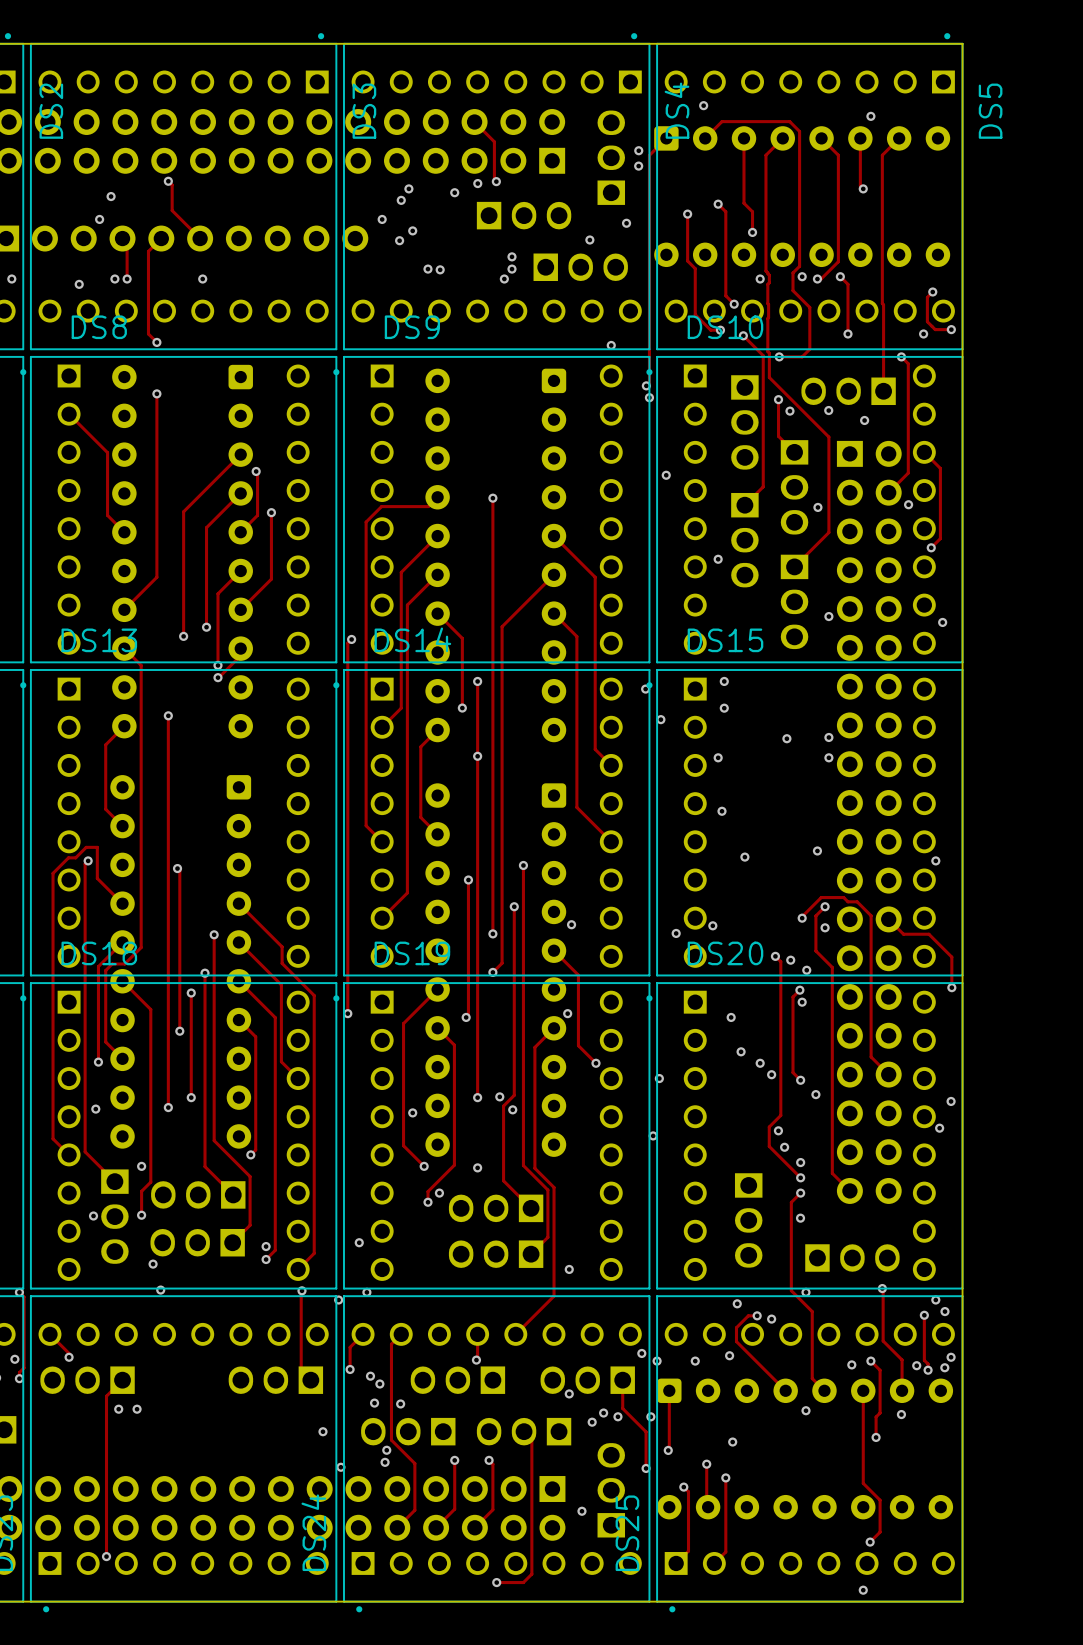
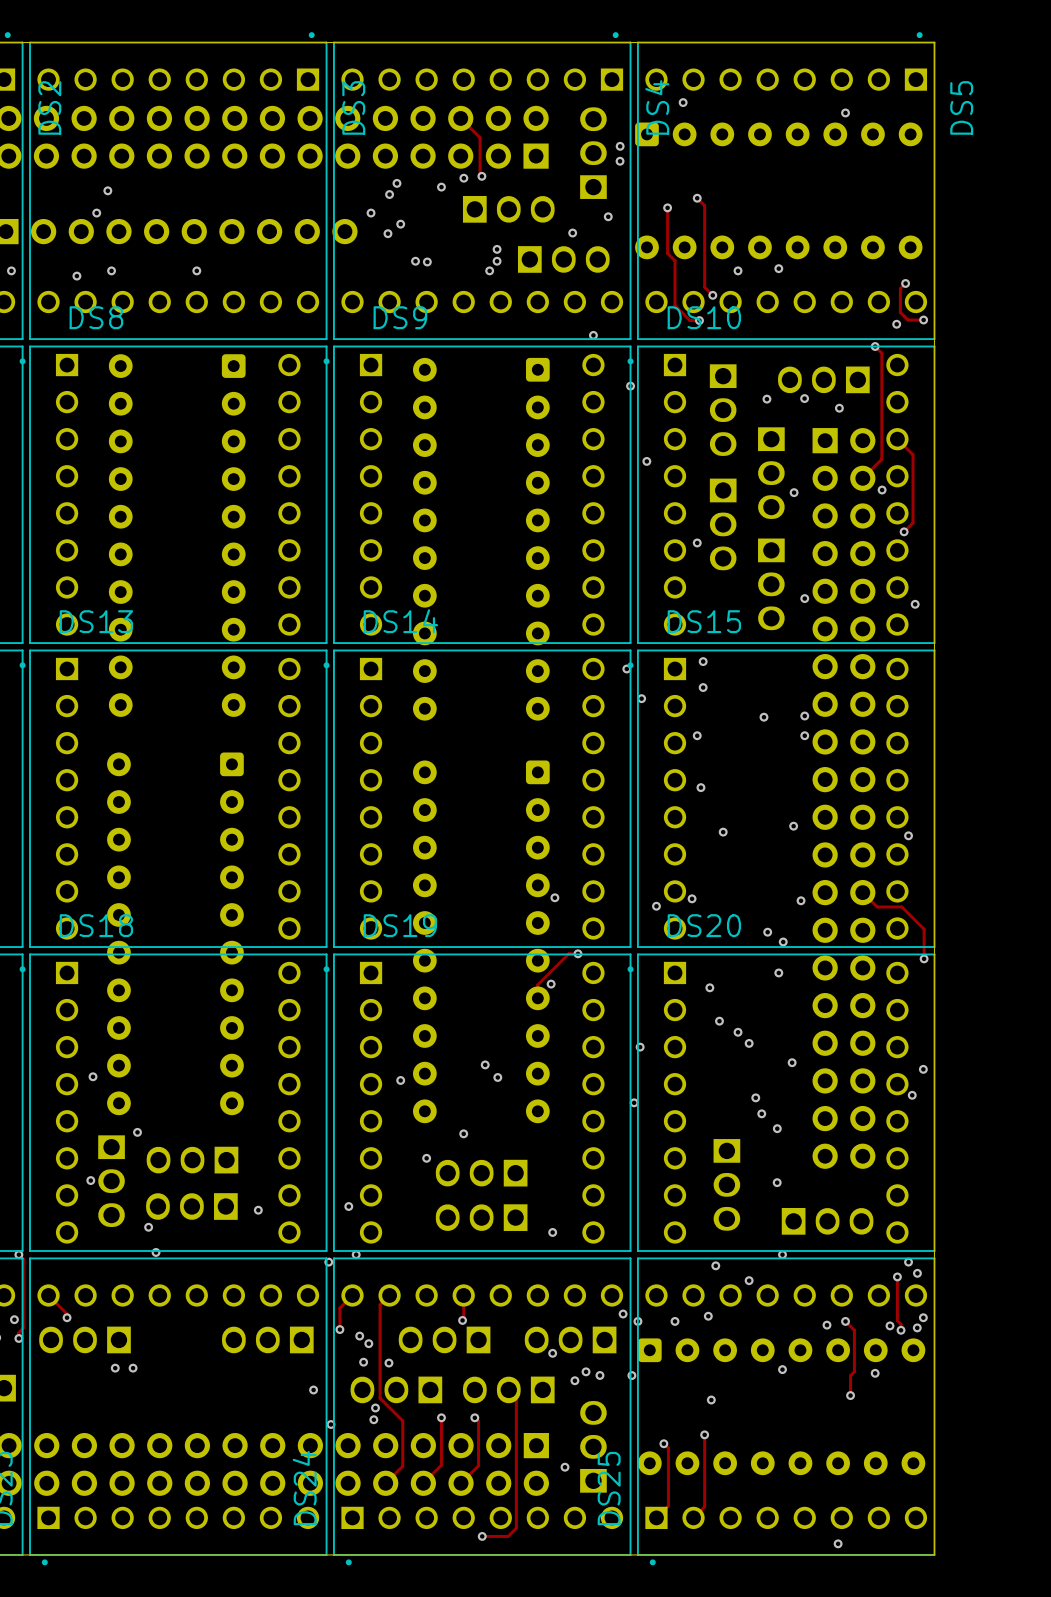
track: (666, 138) (649, 155) (649, 382) (646, 385) -> none
track: (705, 138) (722, 121) (789, 121) (799, 131) (799, 266) (793, 272) (793, 290) (809, 307) (809, 349) (802, 356) (779, 356) -> none
track: (743, 138) (743, 203) (752, 211) (752, 232) -> none
track: (782, 138) (765, 155) (765, 271) (769, 275) (767, 351) (769, 377) (828, 437) (828, 532) (794, 566) -> none
track: (821, 138) (838, 155) (838, 261) (821, 279) (817, 279) -> none
track: (860, 138) (860, 186) (863, 188) -> none
track: (899, 138) (882, 155) (883, 391) -> none
track: (168, 181) (172, 185) (172, 210) (200, 238) -> none
via: (168, 181) -> none
via: (863, 188) -> none
via: (752, 232) -> none
track: (122, 238) (127, 243) (127, 279) -> none
track: (161, 238) (148, 251) (148, 334) (156, 342) -> none
track: (840, 276) (847, 284) (847, 333) -> none
via: (840, 276) -> none
via: (127, 279) -> none
via: (817, 279) -> none
via: (847, 333) -> none
track: (743, 335) (763, 355) (763, 486) (744, 505) -> none
via: (743, 335) -> none
via: (156, 342) -> none
via: (779, 356) -> none
via: (646, 385) -> none
track: (156, 393) (156, 577) (124, 609) -> none
via: (156, 393) -> none
track: (778, 399) (778, 436) (794, 452) -> none
via: (778, 399) -> none
track: (69, 414) (107, 452) (107, 515) (124, 532) -> none
track: (240, 454) (183, 511) (183, 636) -> none
track: (256, 471) (257, 515) (240, 532) -> none
via: (256, 471) -> none
track: (240, 493) (206, 527) (206, 627) -> none
track: (437, 497) (428, 506) (381, 506) (366, 522) (366, 825) (382, 841) -> none
track: (492, 498) (492, 933) -> none
via: (492, 498) -> none
track: (271, 512) (271, 579) (240, 609) -> none
via: (271, 512) -> none
track: (437, 536) (401, 572) (401, 708) (382, 727) -> none
track: (553, 536) (595, 577) (595, 749) (611, 765) -> none
track: (240, 571) (217, 593) (217, 665) -> none
track: (437, 574) (407, 605) (407, 892) (382, 918) -> none
track: (553, 574) (502, 626) (502, 963) (492, 972) -> none
track: (437, 613) (462, 638) (462, 708) -> none
track: (553, 613) (576, 636) (576, 807) (611, 841) -> none
via: (206, 627) -> none
via: (183, 636) -> none
track: (351, 639) (347, 643) (347, 1013) -> none
via: (351, 639) -> none
track: (124, 648) (141, 665) (141, 947) (124, 964) (112, 964) (105, 970) (105, 1042) (122, 1058) -> none
track: (240, 648) (240, 655) (217, 677) -> none
via: (217, 665) -> none
via: (217, 677) -> none
track: (477, 681) (477, 1097) -> none
via: (477, 681) -> none
via: (462, 708) -> none
track: (168, 715) (168, 1107) -> none
via: (168, 715) -> none
track: (124, 726) (105, 744) (105, 809) (122, 826) -> none
track: (437, 730) (420, 746) (420, 817) (437, 834) -> none
via: (477, 756) -> none
track: (88, 860) (85, 863) (85, 1151) (114, 1181) -> none
via: (88, 860) -> none
track: (523, 865) (523, 1165) (547, 1190) (547, 1237) (531, 1254) -> none
via: (523, 865) -> none
track: (177, 868) (179, 870) (179, 1031) -> none
via: (177, 868) -> none
track: (468, 880) (468, 1015) (466, 1017) -> none
via: (468, 880) -> none
track: (122, 903) (97, 878) (97, 847) (86, 847) (75, 857) (68, 857) (53, 873) (53, 1138) (69, 1154) -> none
track: (238, 903) (282, 946) (282, 963) (314, 995) (314, 1253) (298, 1269) -> none
track: (514, 906) (514, 1095) (503, 1106) (503, 1180) (531, 1208) -> none
via: (514, 906) -> none
track: (825, 906) (815, 915) (815, 951) (832, 967) (832, 1173) (849, 1190) -> none
via: (825, 906) -> none
track: (802, 918) (821, 897) (843, 897) (847, 901) (857, 901) (871, 915) (871, 1056) (888, 1074) -> none
via: (802, 918) -> none
via: (492, 933) -> none
track: (214, 934) (214, 1140) (250, 1176) (250, 1225) (232, 1242) -> none
via: (214, 934) -> none
track: (122, 942) (98, 966) (98, 1062) -> none
track: (238, 942) (281, 984) (281, 1061) (298, 1078) -> none
track: (553, 950) (578, 975) (578, 1045) (595, 1063) -> none
track: (775, 956) (780, 961) (780, 1115) (769, 1127) (769, 1146) (800, 1177) -> none
via: (775, 956) -> none
via: (492, 972) -> none
track: (205, 973) (205, 1166) (233, 1194) -> none
via: (205, 973) -> none
track: (122, 981) (150, 1009) (150, 1182) (141, 1191) (141, 1215) -> none
track: (238, 981) (275, 1017) (275, 1250) (266, 1259) -> none
via: none -> (577, 953)
track: (437, 989) (403, 1023) (403, 1145) (424, 1166) -> none
track: (799, 990) (793, 997) (793, 1072) (800, 1080) -> none
via: (799, 990) -> none
track: (191, 993) (191, 1097) -> none
via: (191, 993) -> none
via: (347, 1013) -> none
via: (466, 1017) -> none
track: (238, 1020) (255, 1036) (255, 1150) (250, 1154) -> none
track: (437, 1028) (454, 1045) (454, 1165) (428, 1191) (428, 1202) -> none
track: (553, 1028) (534, 1047) (534, 1168) (554, 1187) (554, 1296) (515, 1334) -> (537, 998) (537, 984) (568, 953) (577, 953)
via: (179, 1031) -> none
via: (98, 1062) -> none
via: (595, 1063) -> none
via: (800, 1080) -> none
via: (191, 1097) -> none
via: (477, 1097) -> none
via: (168, 1107) -> none
via: (250, 1154) -> none
via: (424, 1166) -> none
via: (800, 1177) -> none
track: (800, 1193) (791, 1202) (791, 1290) (812, 1311) (812, 1378) (824, 1390) -> none
via: (800, 1193) -> none
via: (428, 1202) -> none
via: (141, 1215) -> none
via: (266, 1259) -> none
track: (882, 1288) (883, 1341) (902, 1359) (902, 1390) -> none
via: (882, 1288) -> none
track: (301, 1290) (301, 1370) (310, 1380) -> none
via: (301, 1290) -> none
track: (757, 1315) (748, 1315) (736, 1327) (736, 1341) (785, 1390) -> none
via: (757, 1315) -> none
track: (122, 1380) (106, 1396) (106, 1556) -> none
track: (622, 1380) (622, 1408) (646, 1431) (646, 1468) -> none
track: (669, 1390) (668, 1450) -> none
track: (863, 1390) (863, 1483) (880, 1500) (880, 1532) (870, 1542) -> none
via: (668, 1450) -> none
track: (706, 1464) (708, 1507) -> none
via: (706, 1464) -> none
via: (646, 1468) -> none
via: (870, 1542) -> none
via: (106, 1556) -> none

